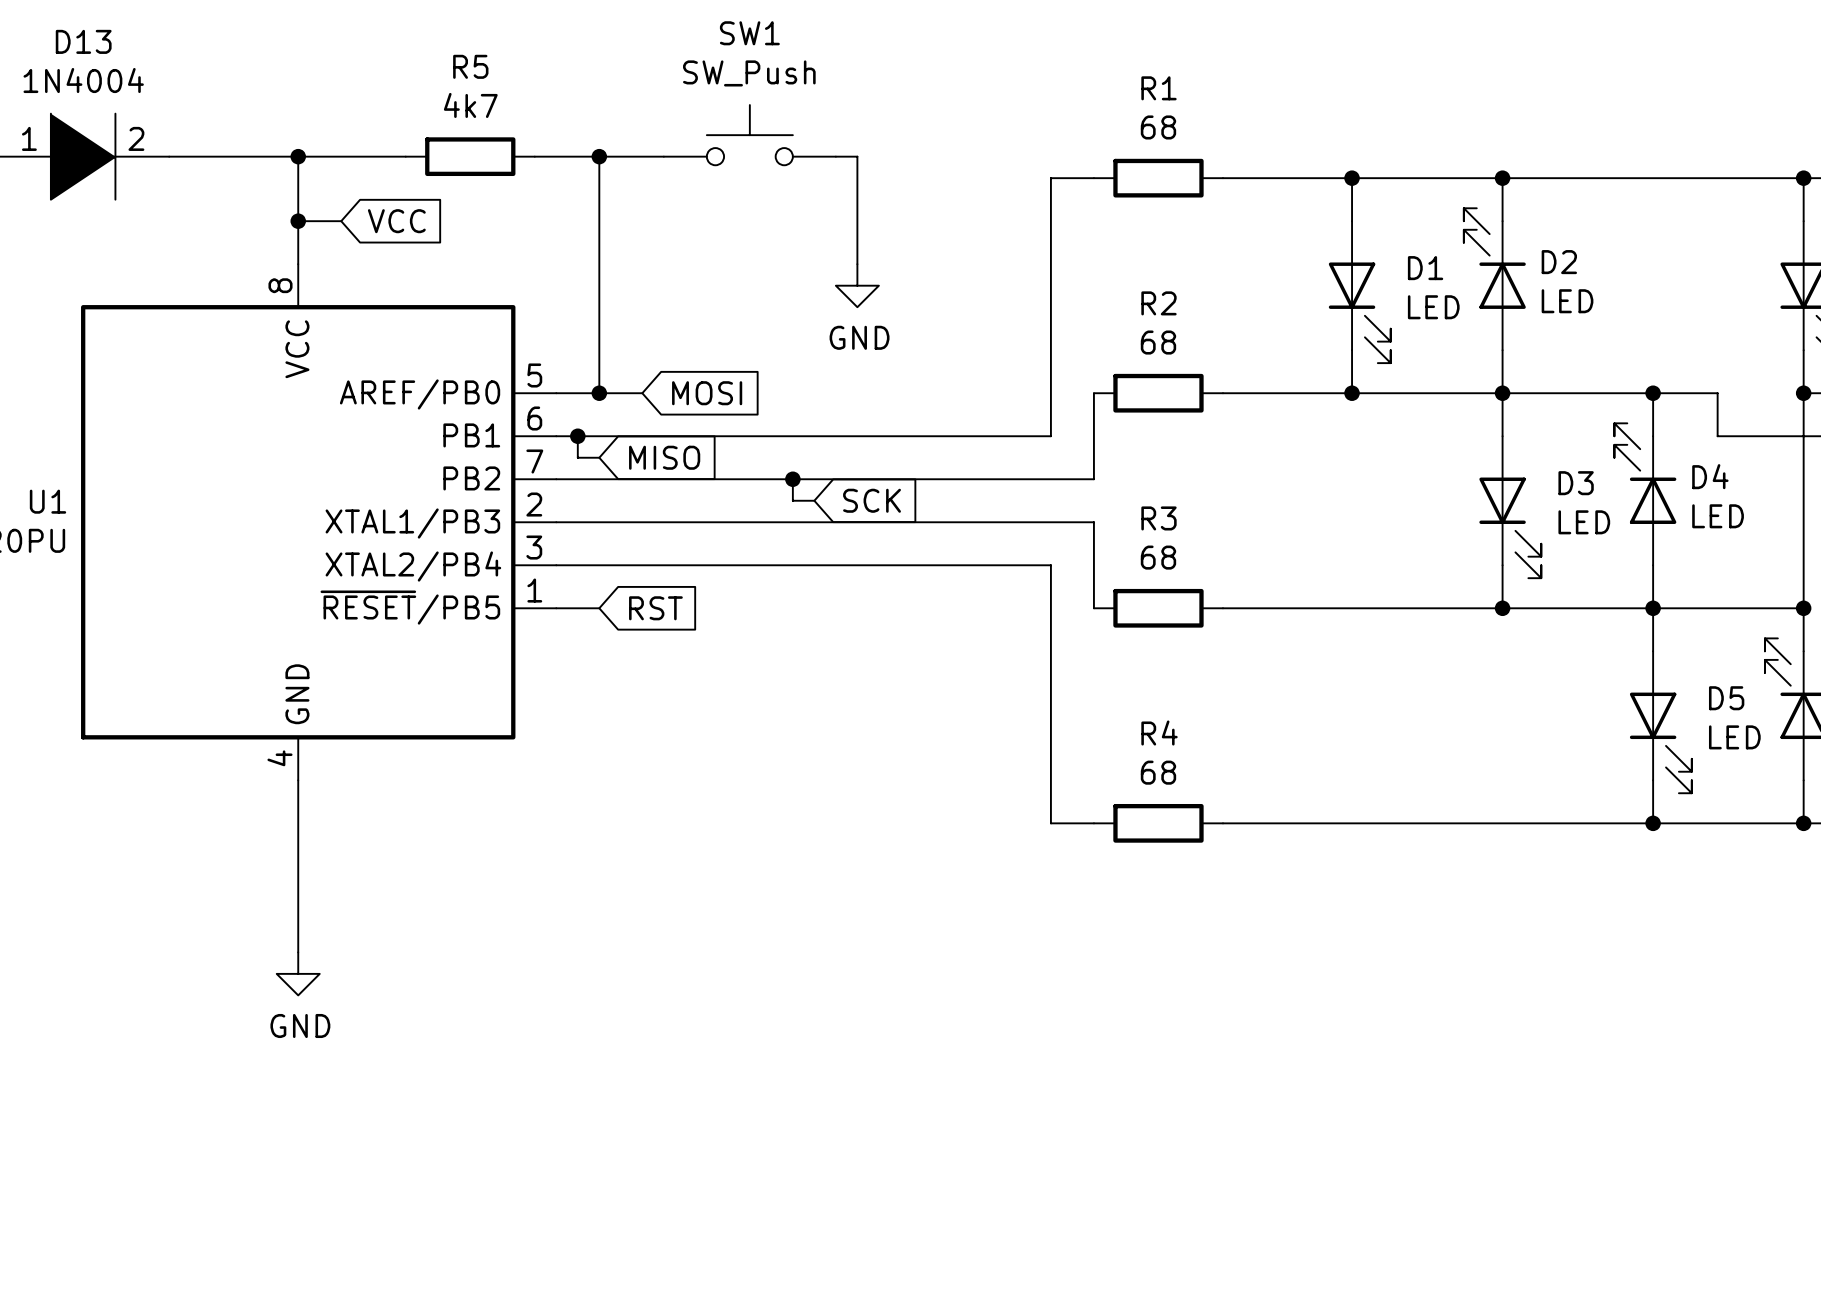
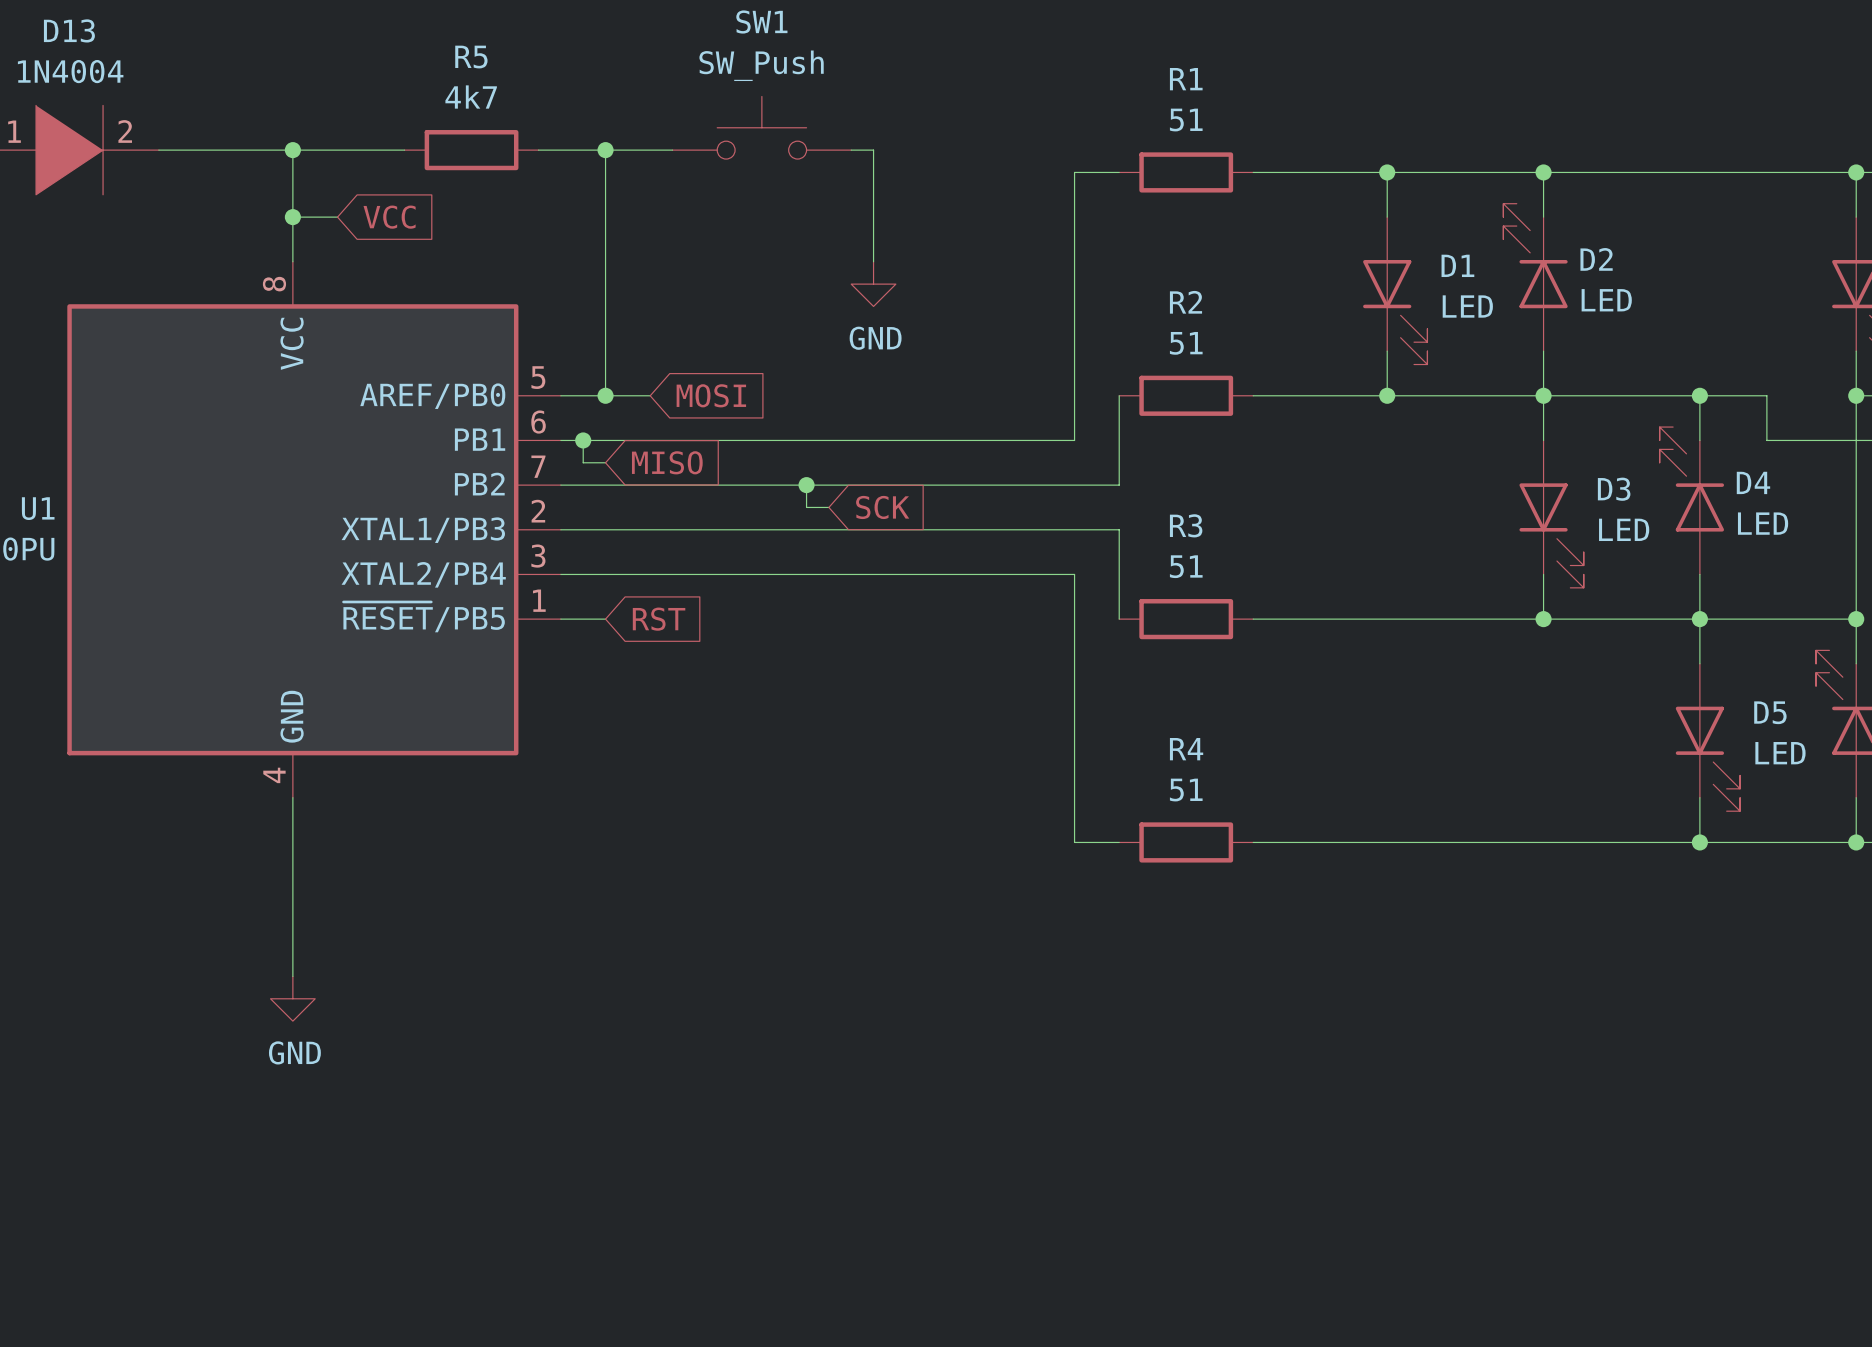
R1 value: 68 (1158, 127) -> 51 (1186, 120)
R2 value: 68 (1158, 342) -> 51 (1186, 343)
R3 value: 68 (1158, 557) -> 51 (1186, 566)
R4 value: 68 (1158, 772) -> 51 (1186, 790)

